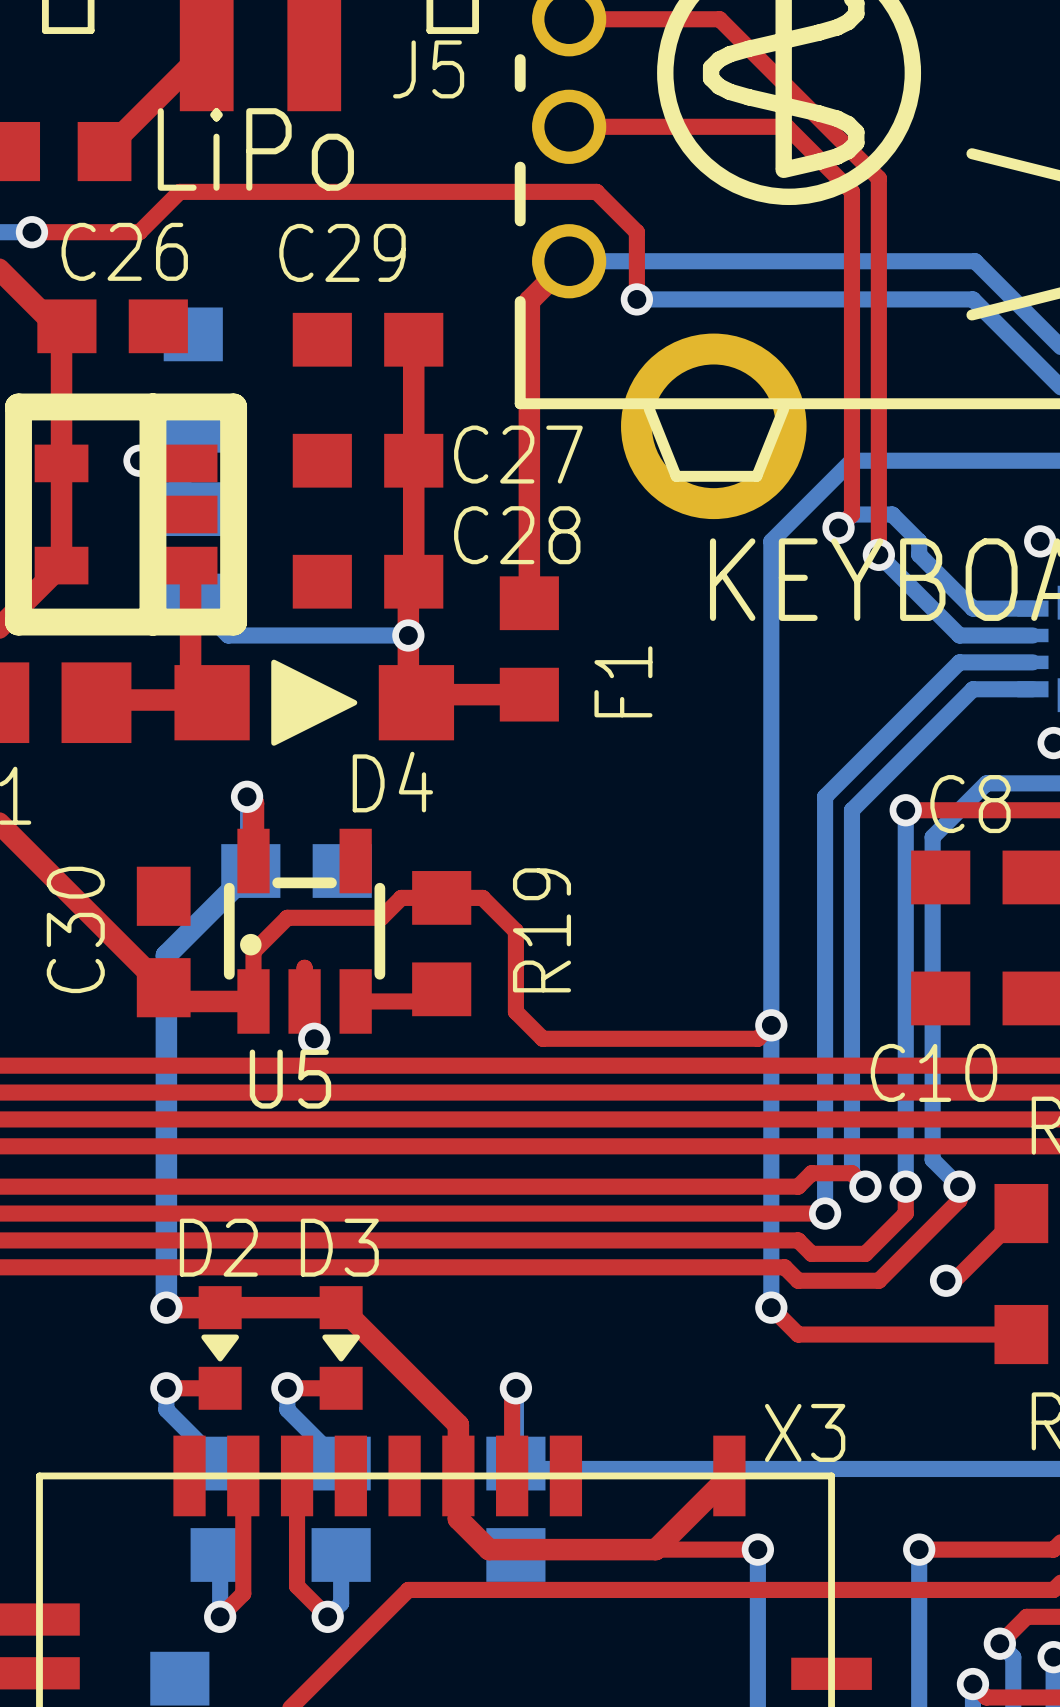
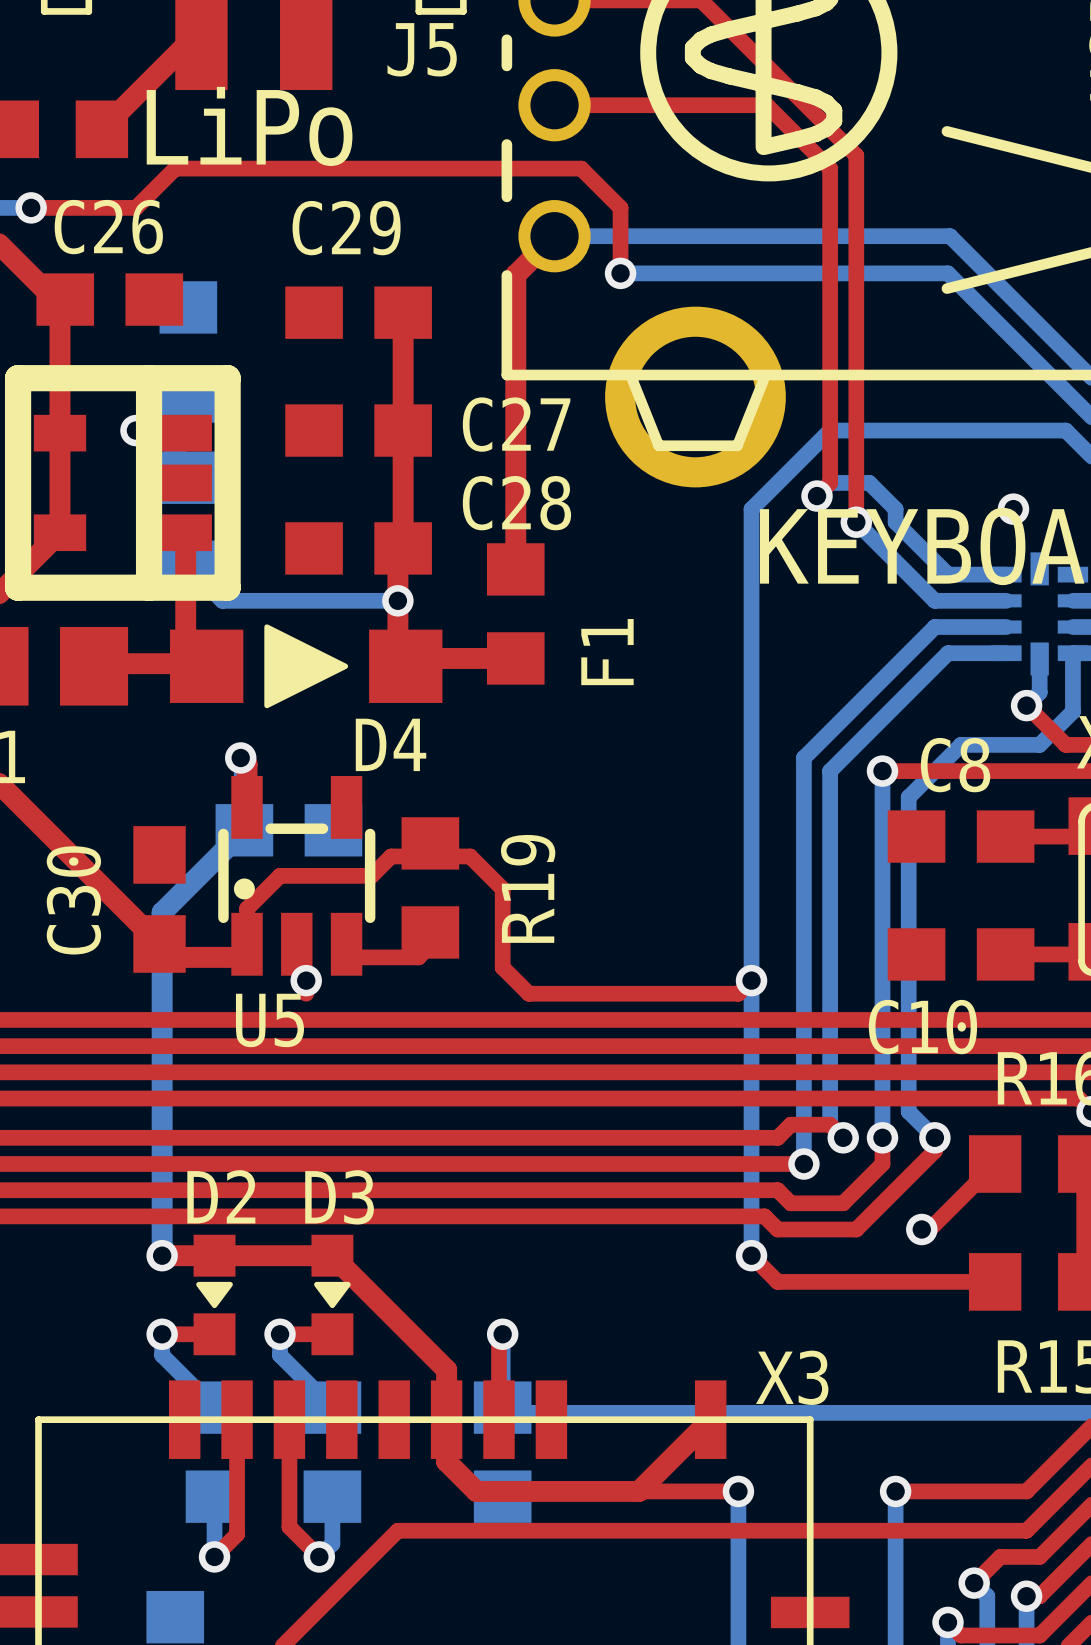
U5 position: (304, 931) -> (296, 875)
R19 position: (441, 943) -> (430, 887)
via position: (314, 1038) -> (306, 980)

